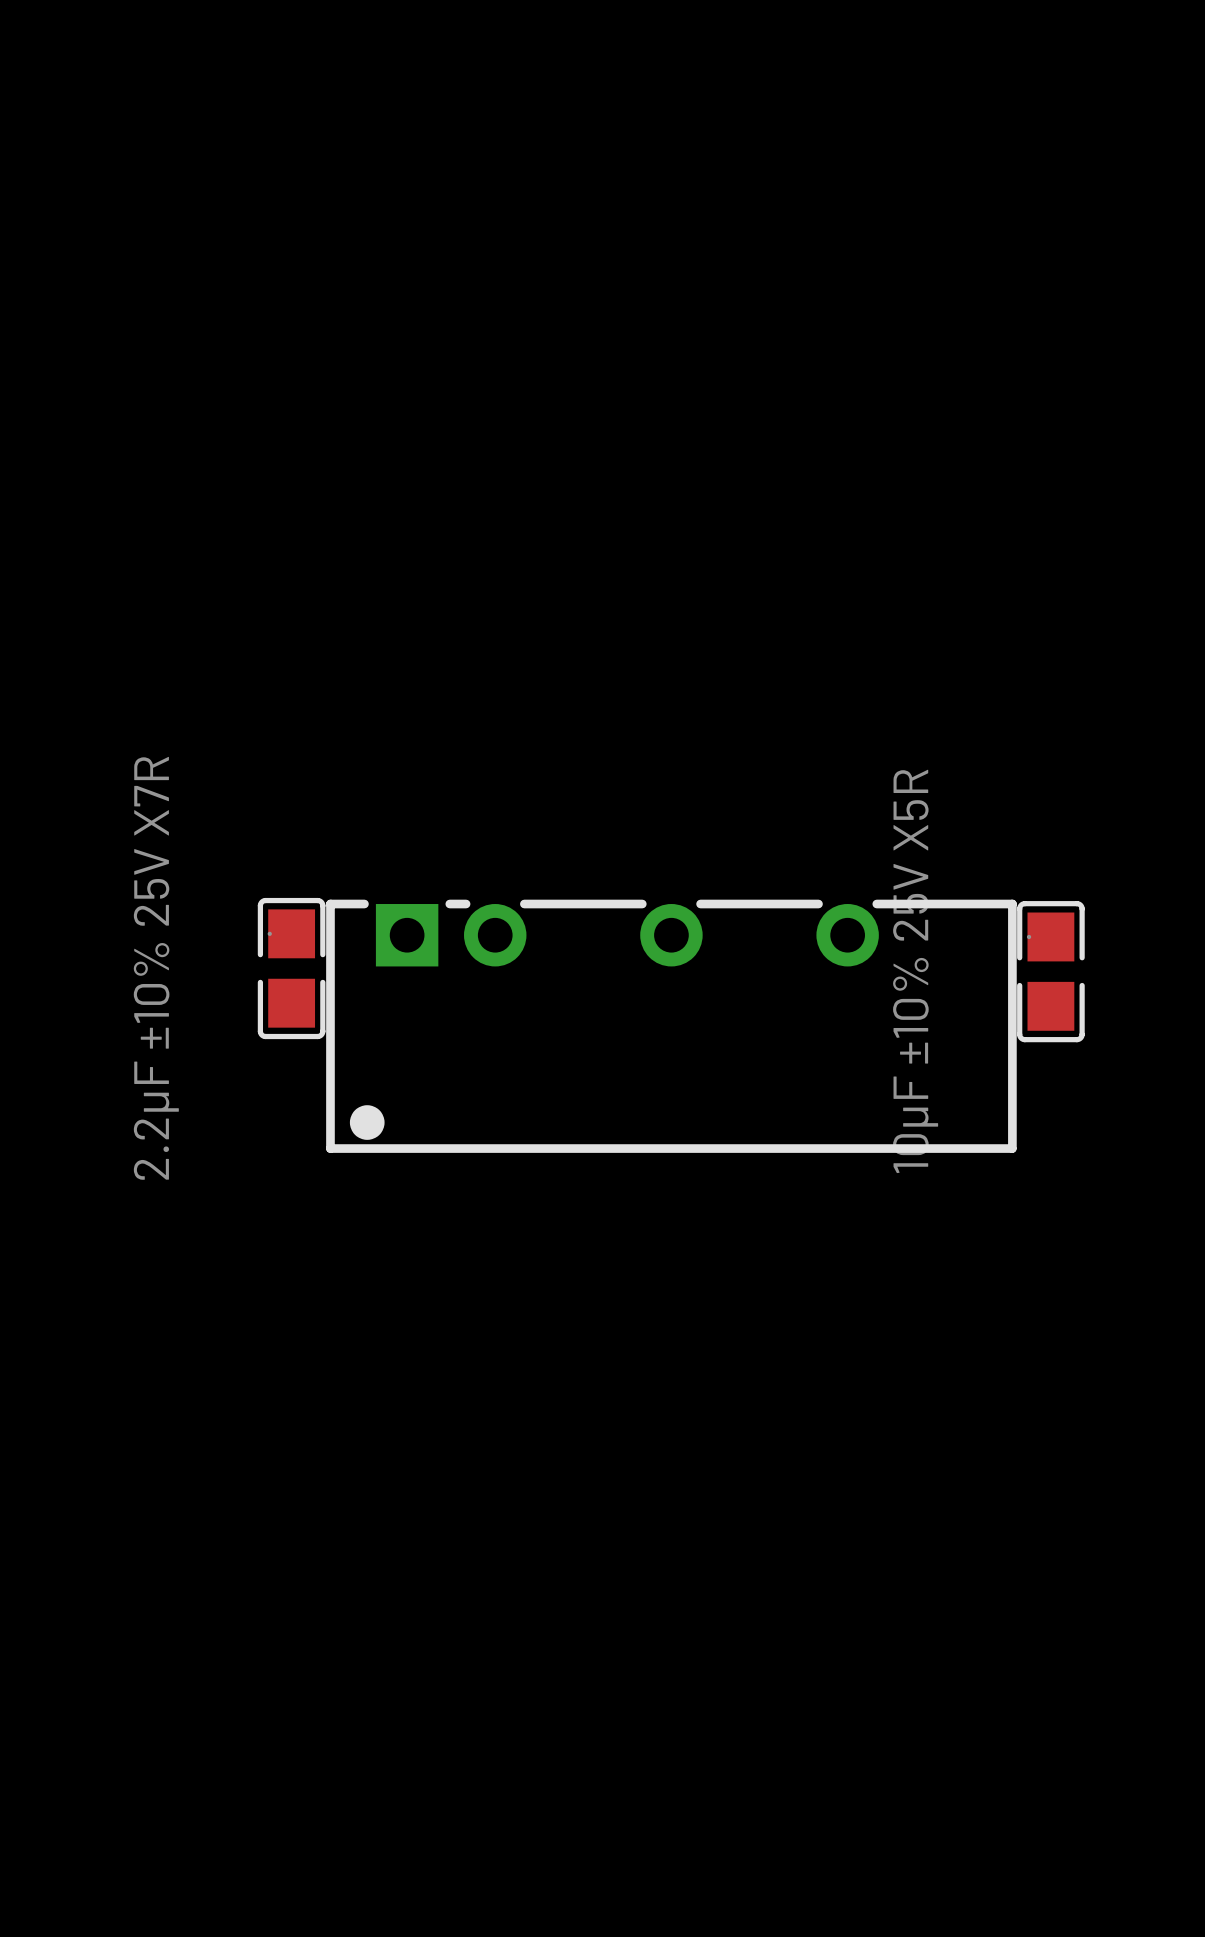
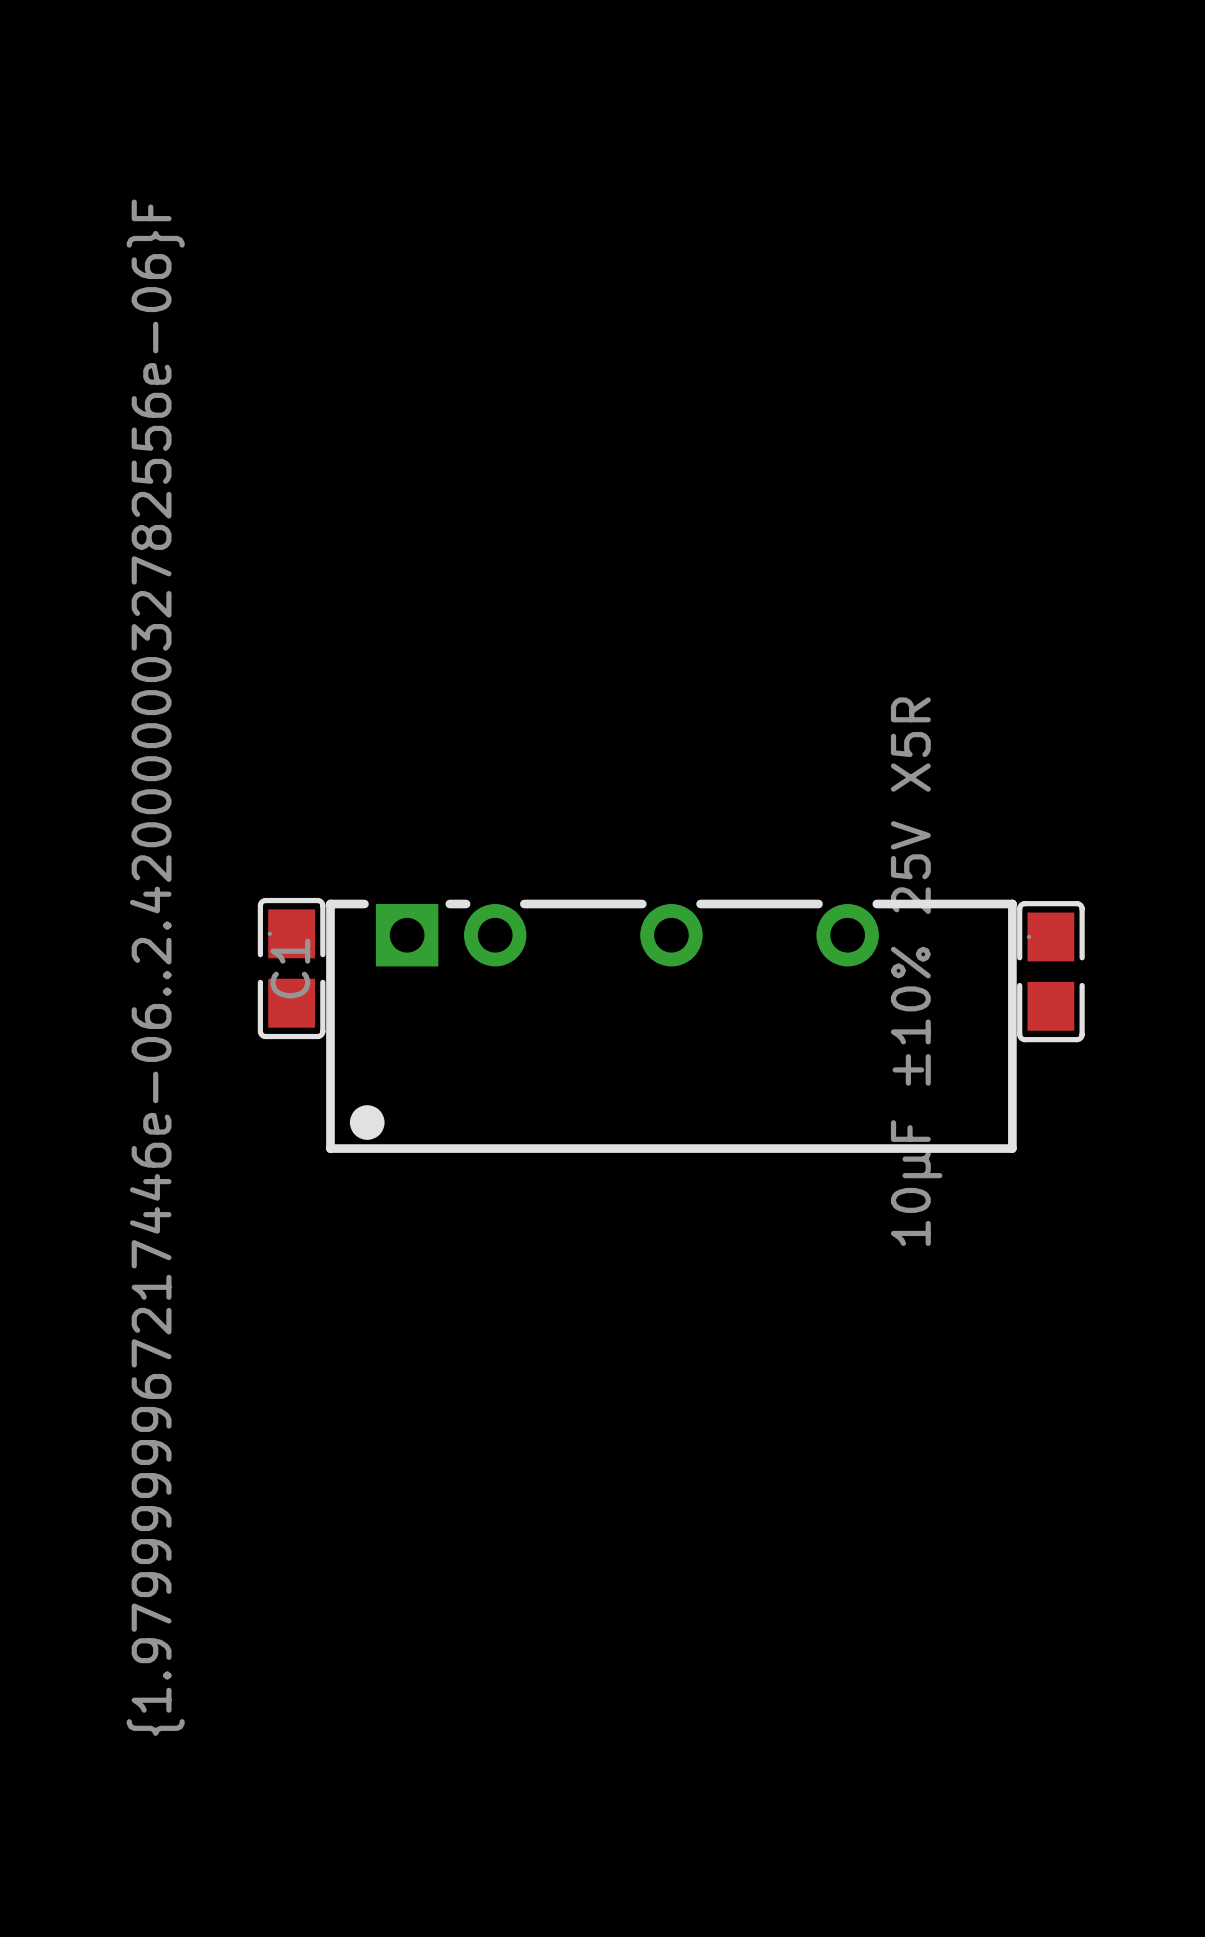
C1 value: 2.2µF ±10% 25V X7R (156, 968) -> {1.9799999967217446e-06..2.4200000032782556e-06}F (155, 967)
C1 name: none -> C1 (290, 968)

